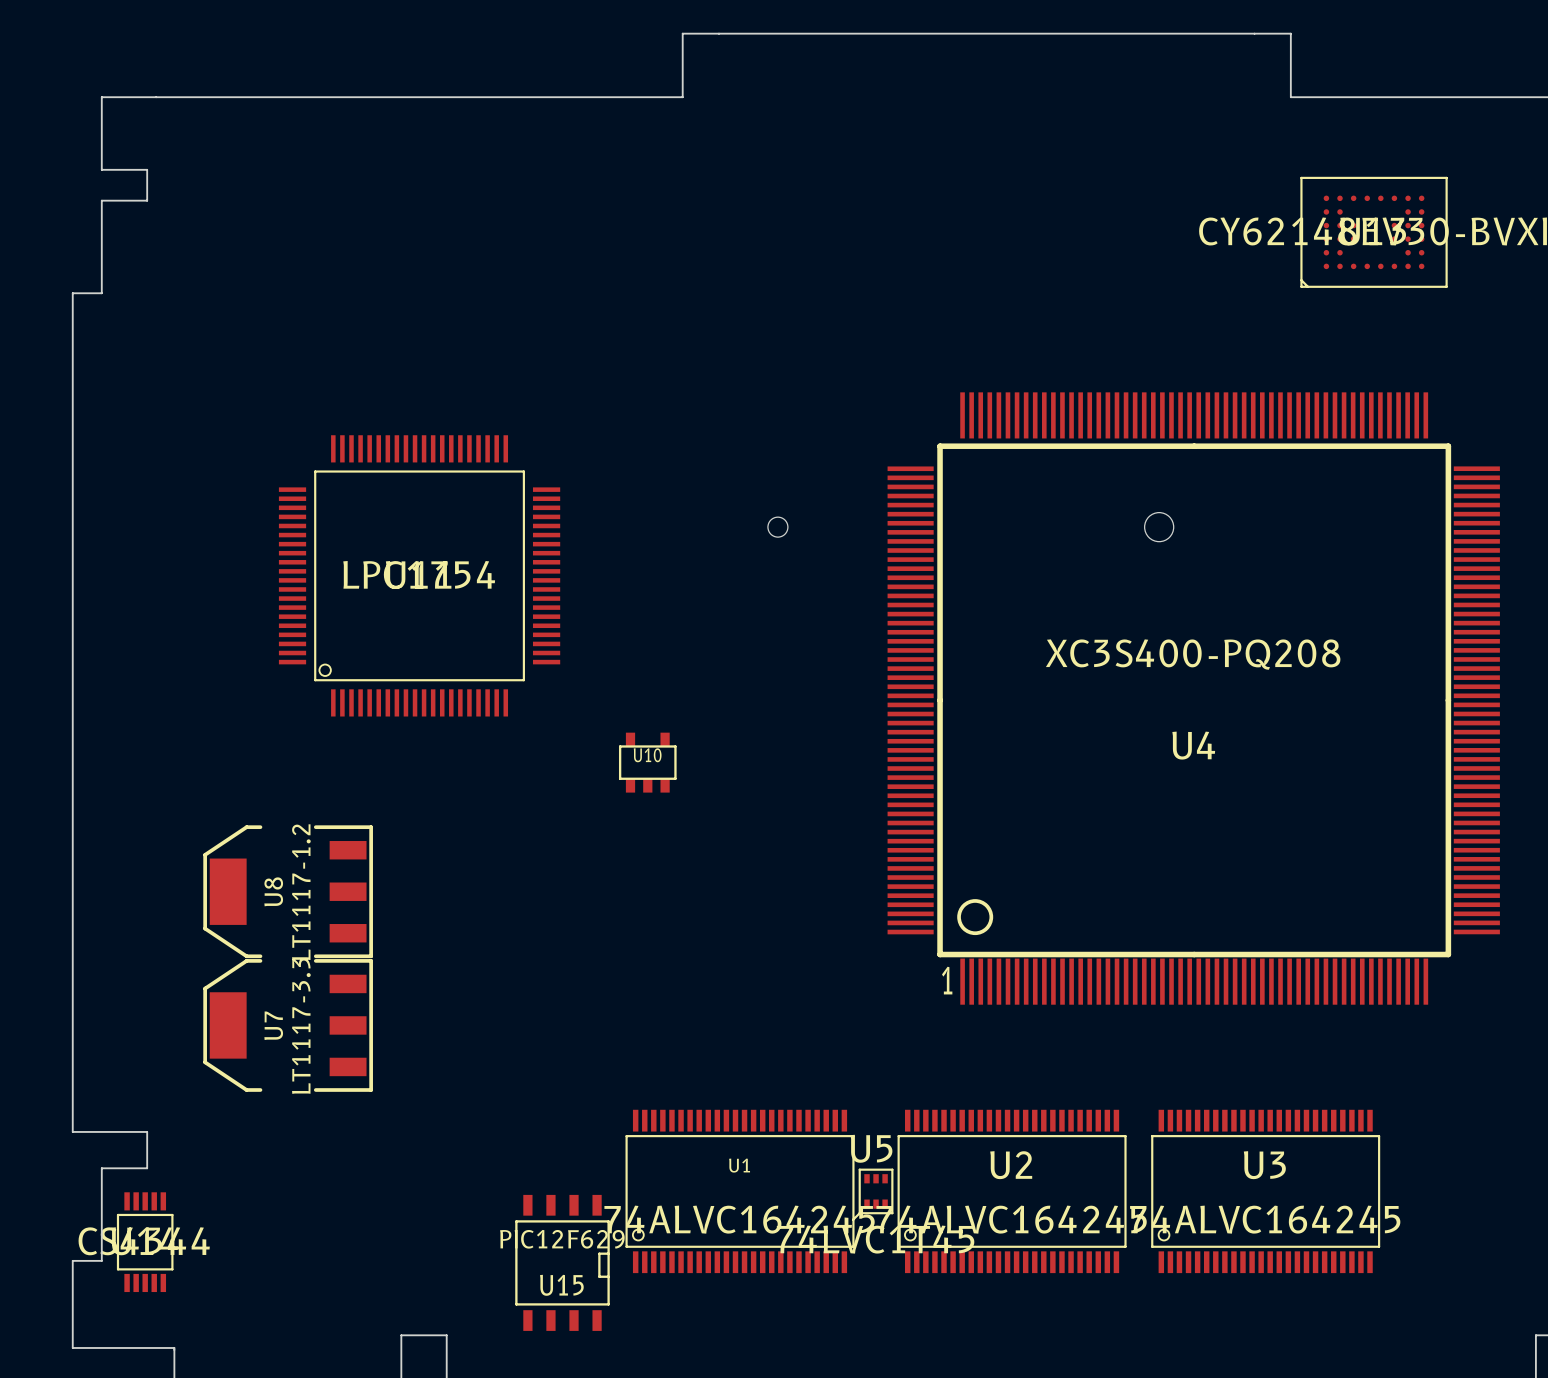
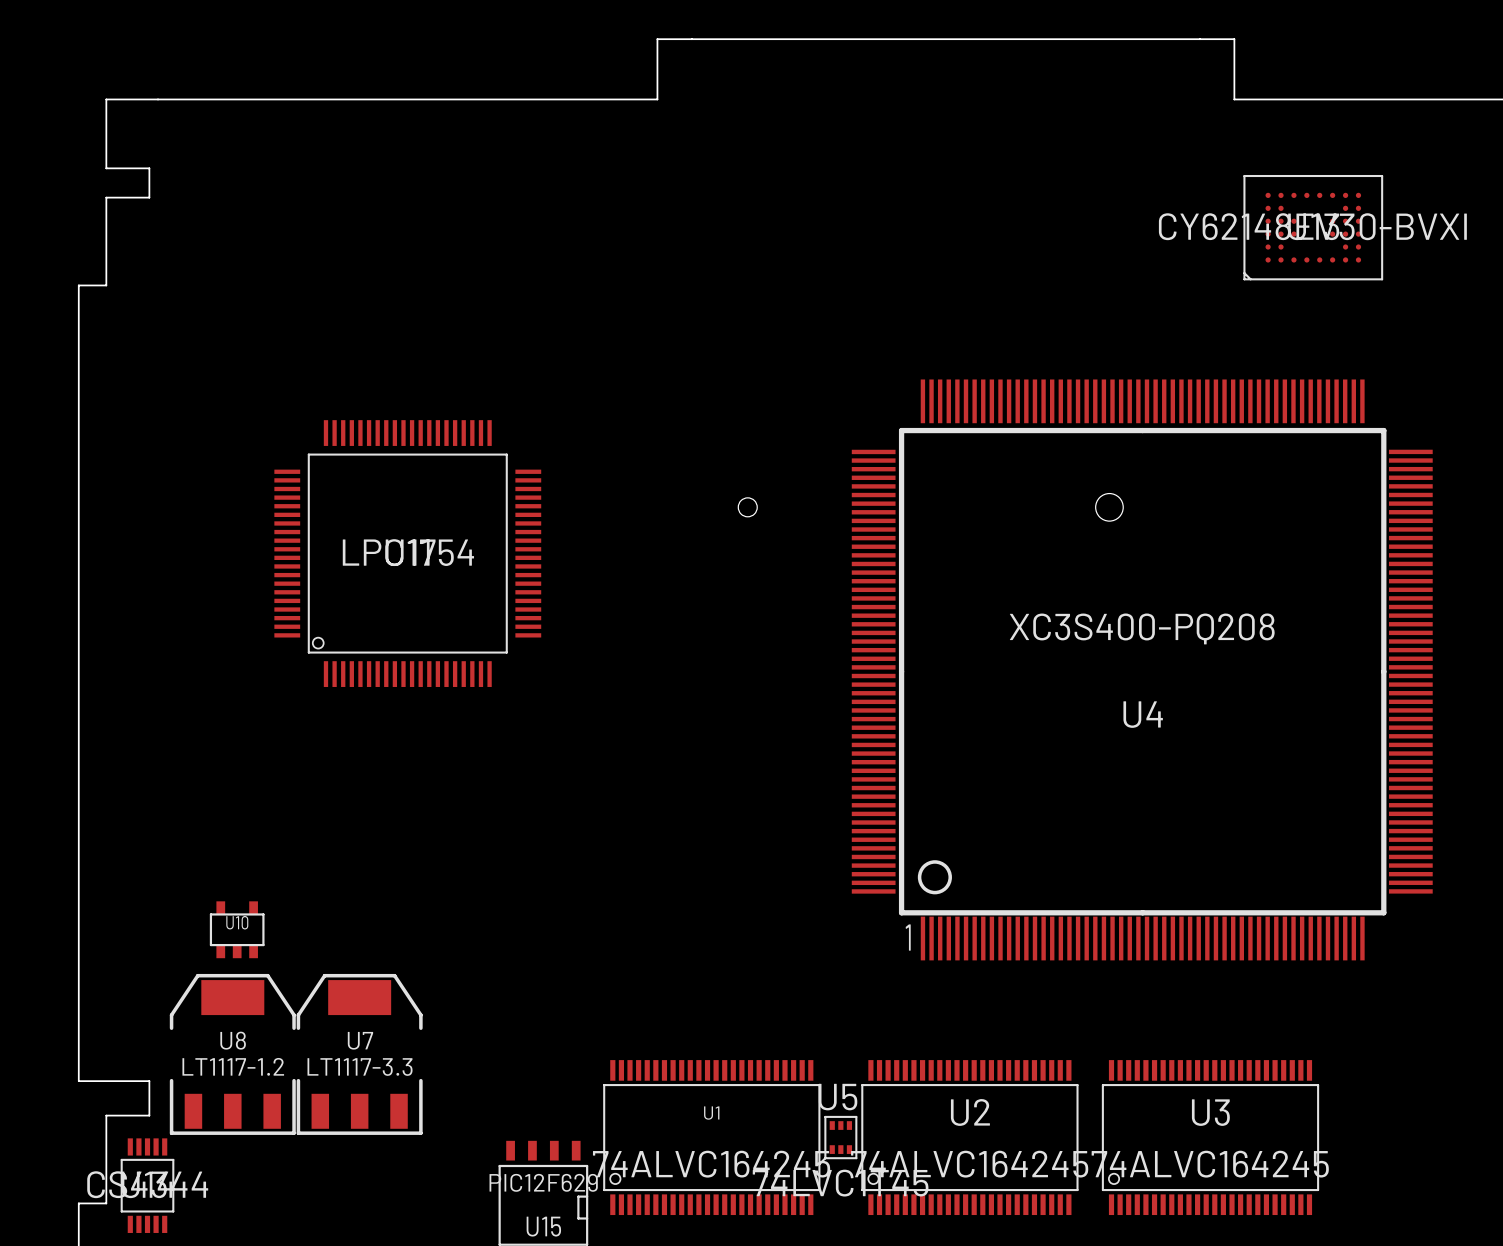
U10 position: (647, 762) -> (237, 929)
U8 rotation: 0° (288, 891) -> 90° clockwise (232, 1054)
U8 position: (288, 891) -> (232, 1054)
U7 rotation: 0° (288, 1025) -> 90° clockwise (359, 1054)
U7 position: (288, 1025) -> (359, 1054)

